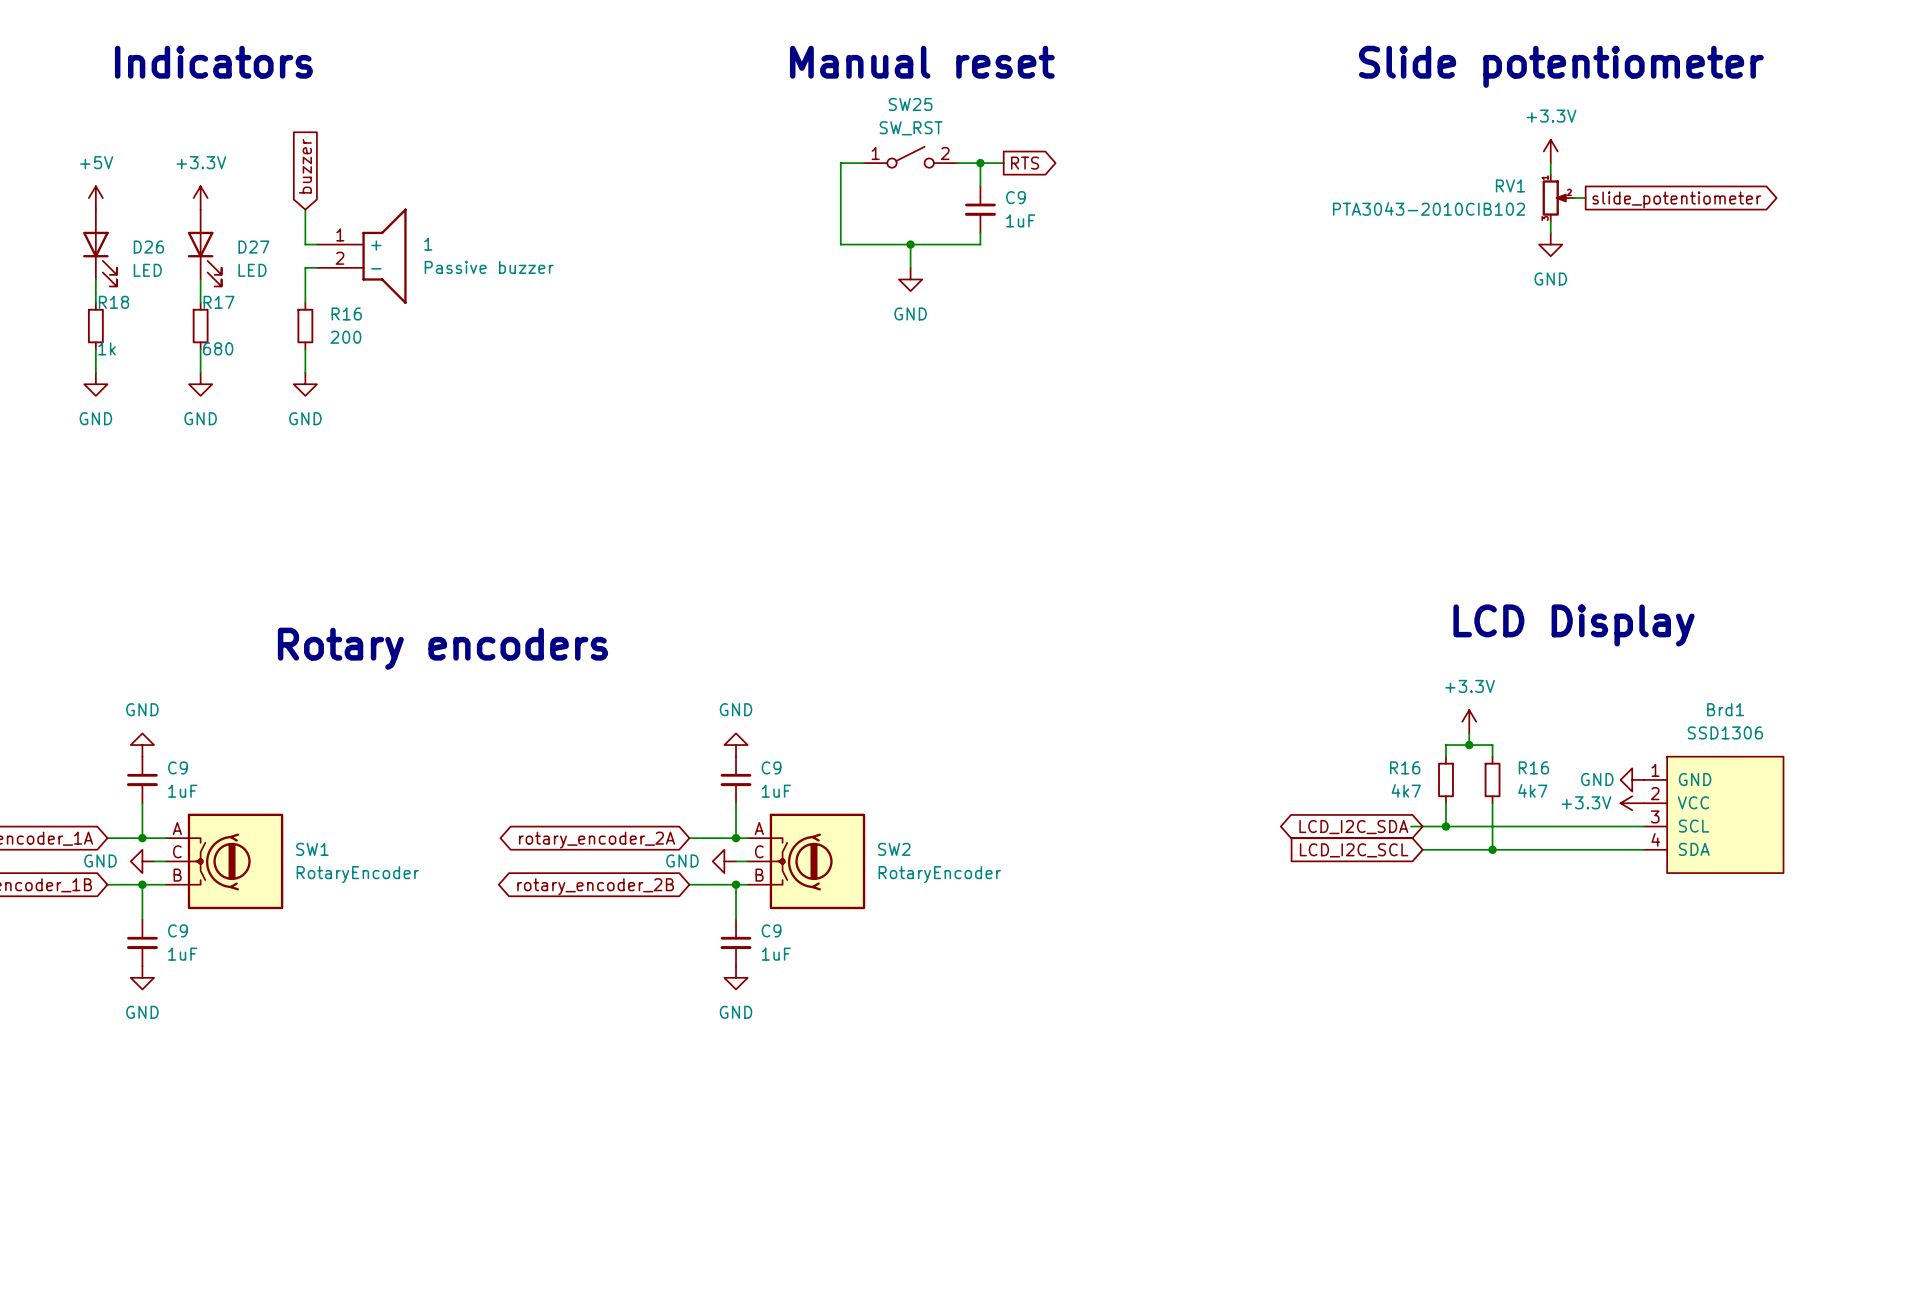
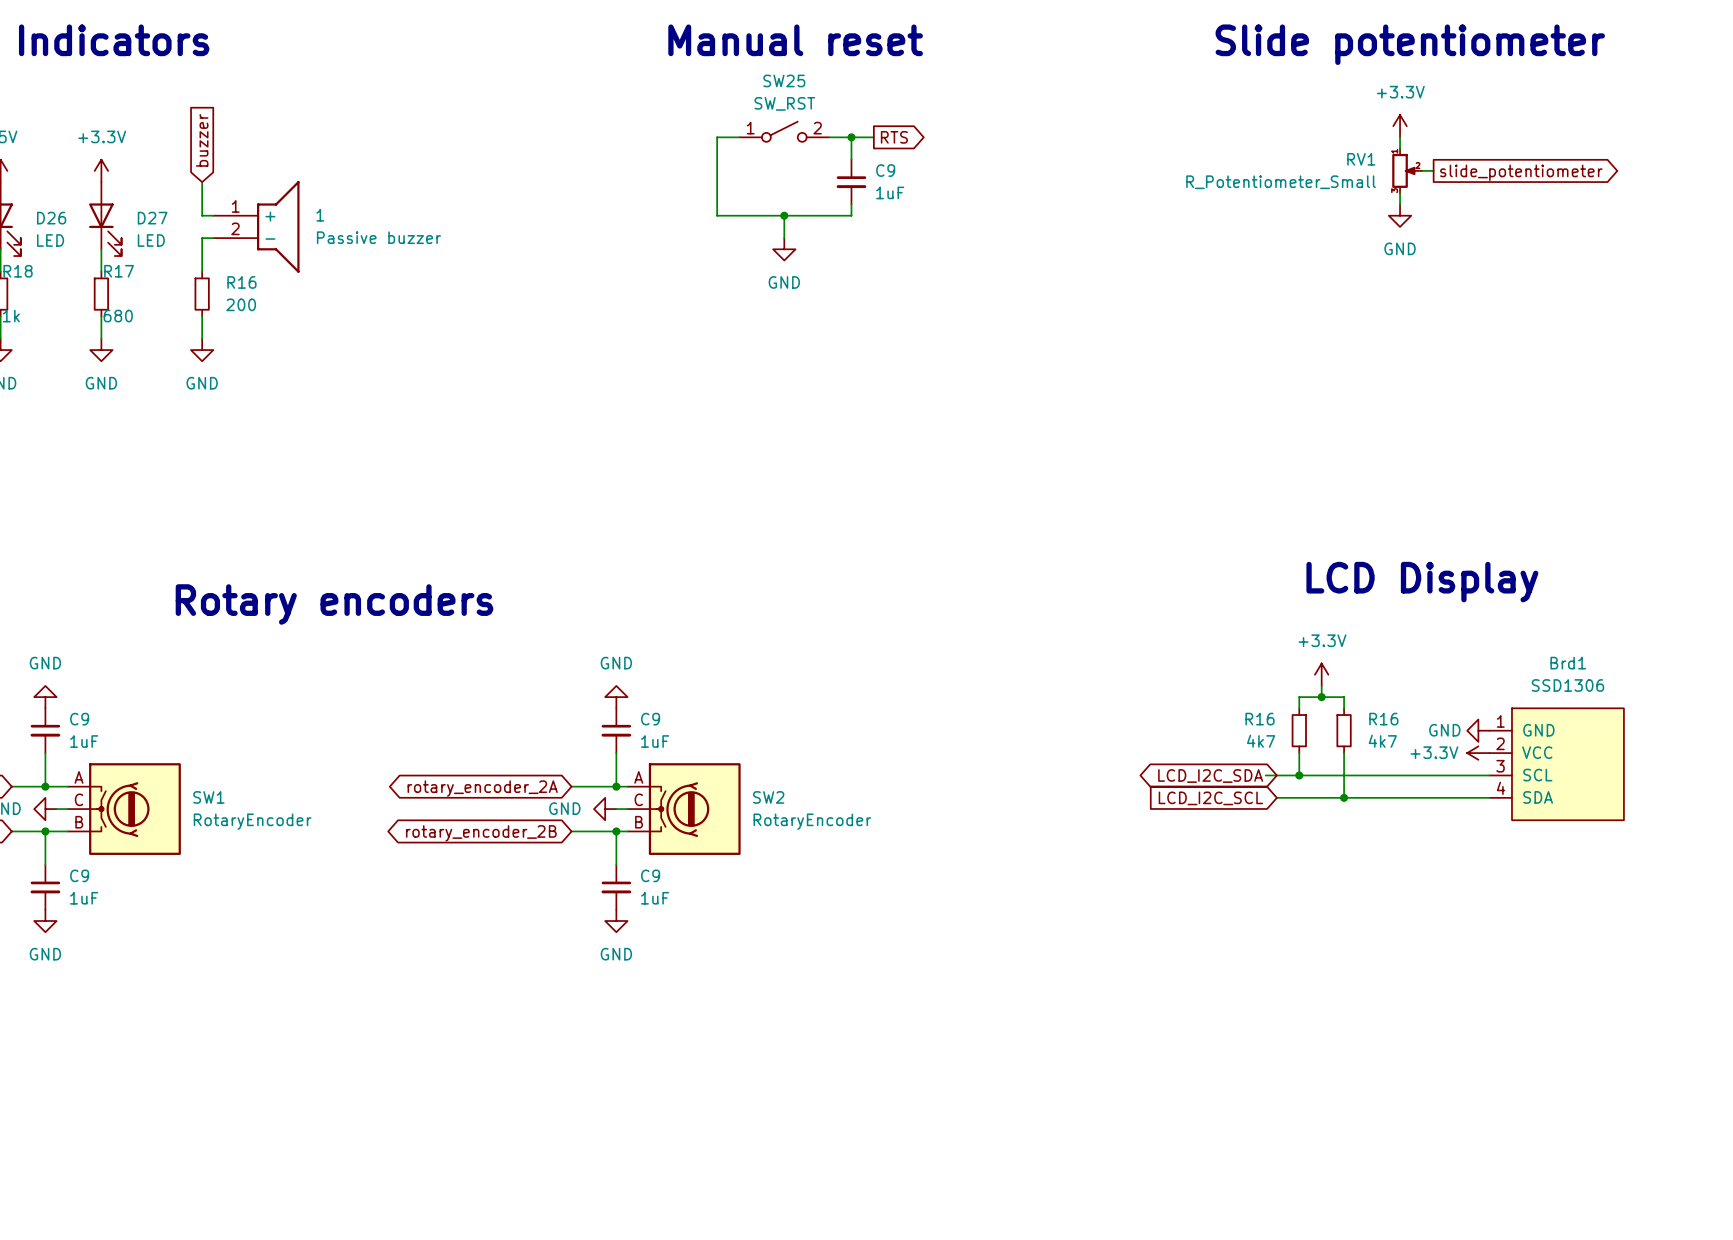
RV1 value: PTA3043-2010CIB102 (1428, 208) -> R_Potentiometer_Small (1281, 182)

